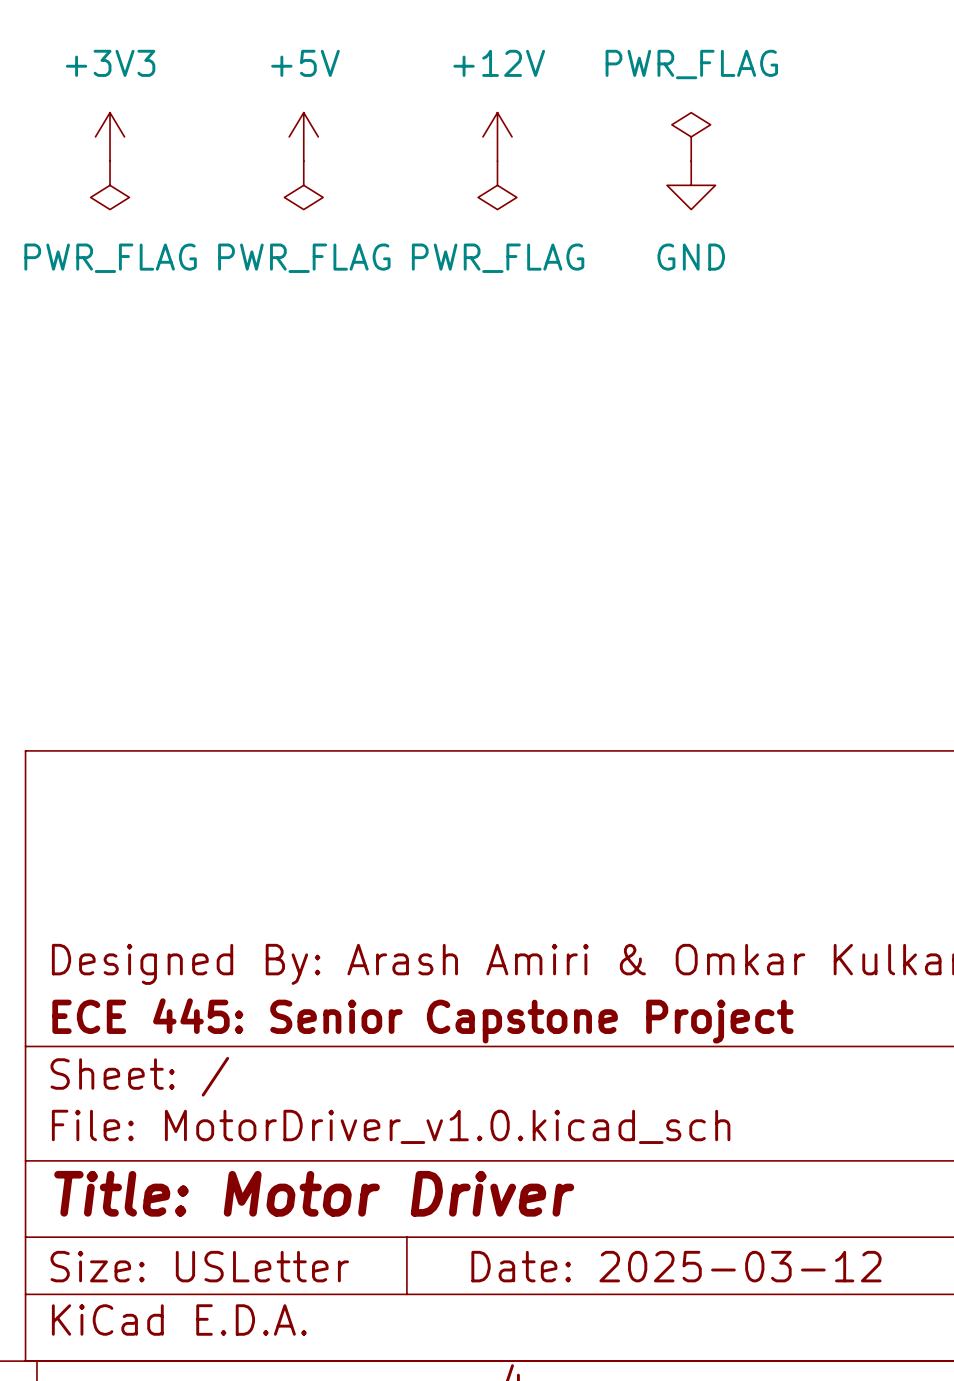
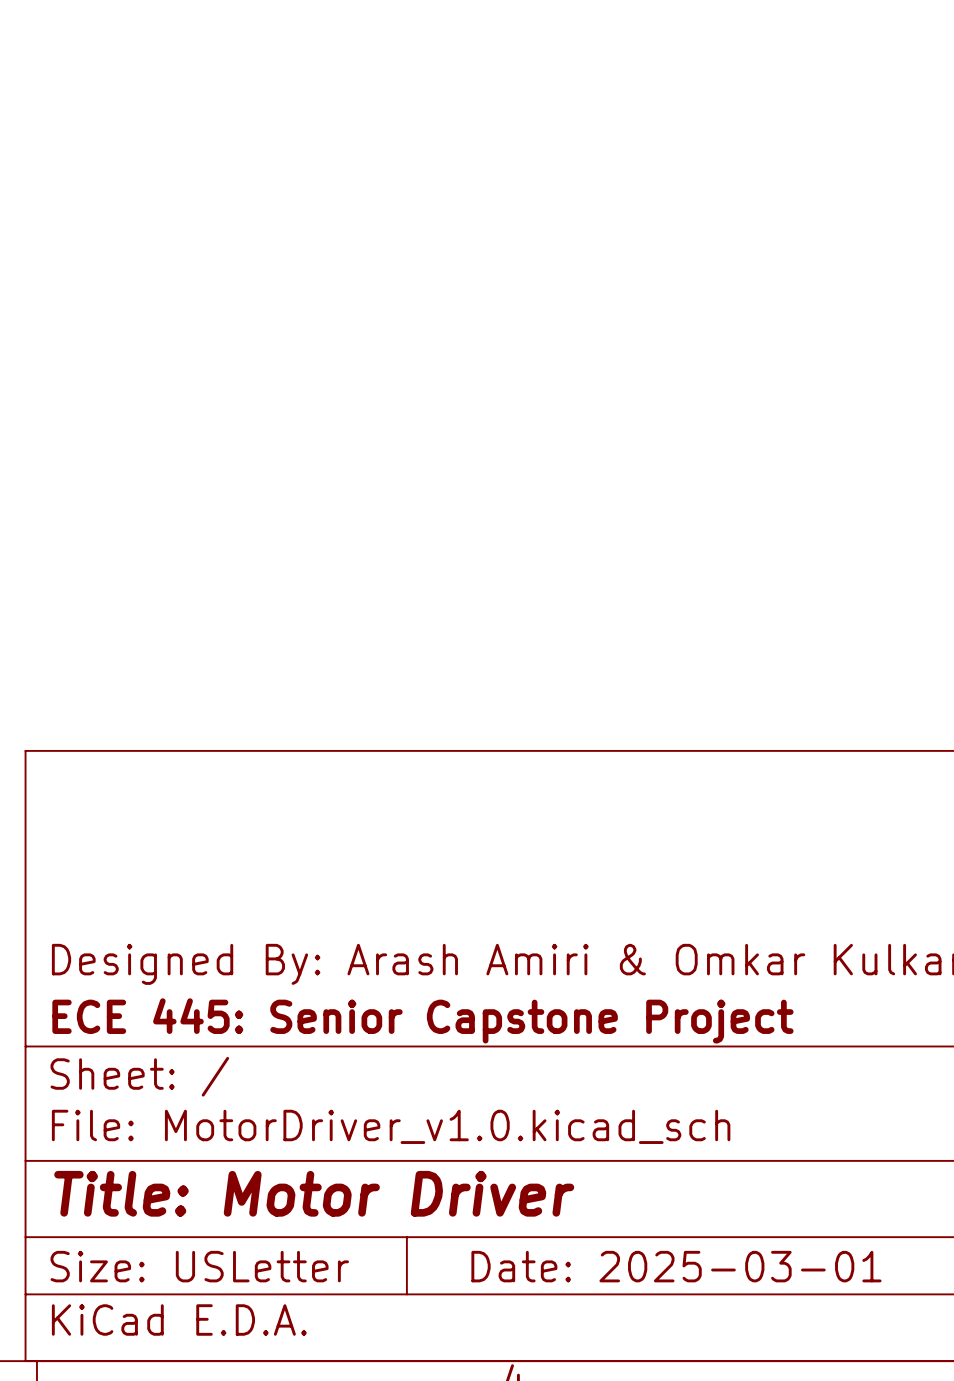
power symbol: +3V3 (110, 136) -> none
power symbol: +5V (303, 136) -> none
power symbol: +12V (497, 136) -> none
power symbol: PWR_FLAG (691, 136) -> none
power symbol: PWR_FLAG (110, 185) -> none
power symbol: PWR_FLAG (303, 185) -> none
power symbol: PWR_FLAG (497, 185) -> none
power symbol: GND (691, 185) -> none
title block: Date: 2025-03-12 (676, 1266) -> Date: 2025-03-01 (676, 1266)

